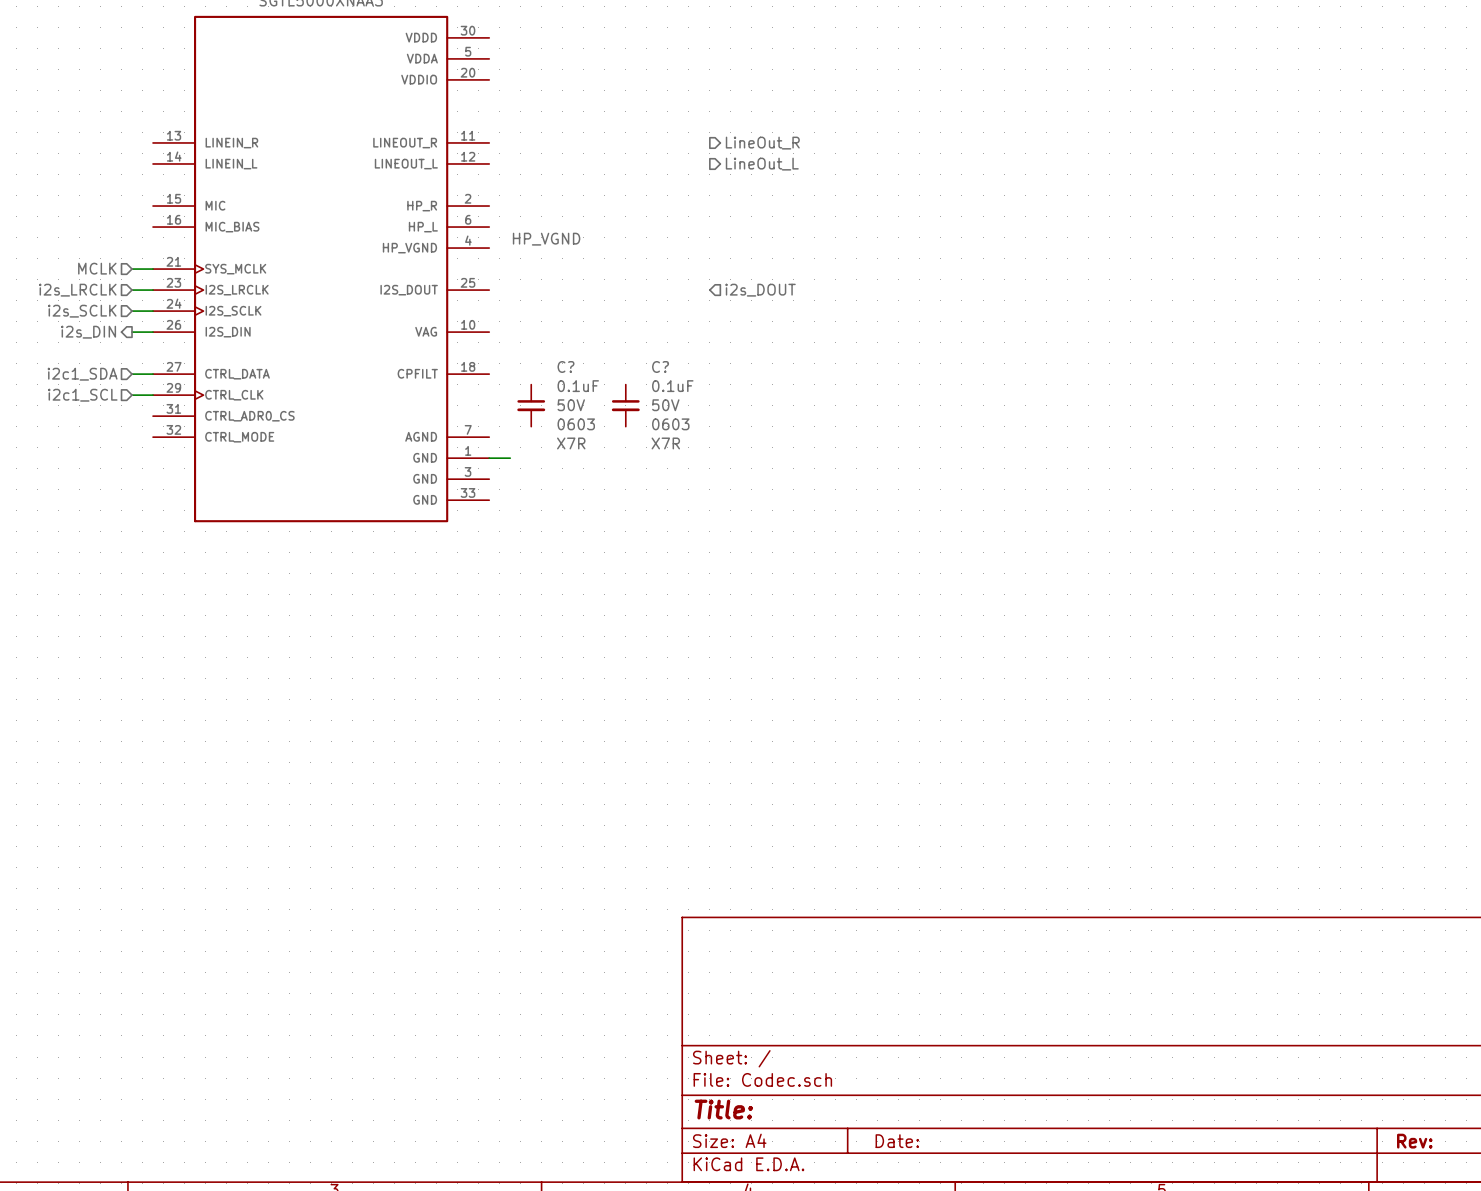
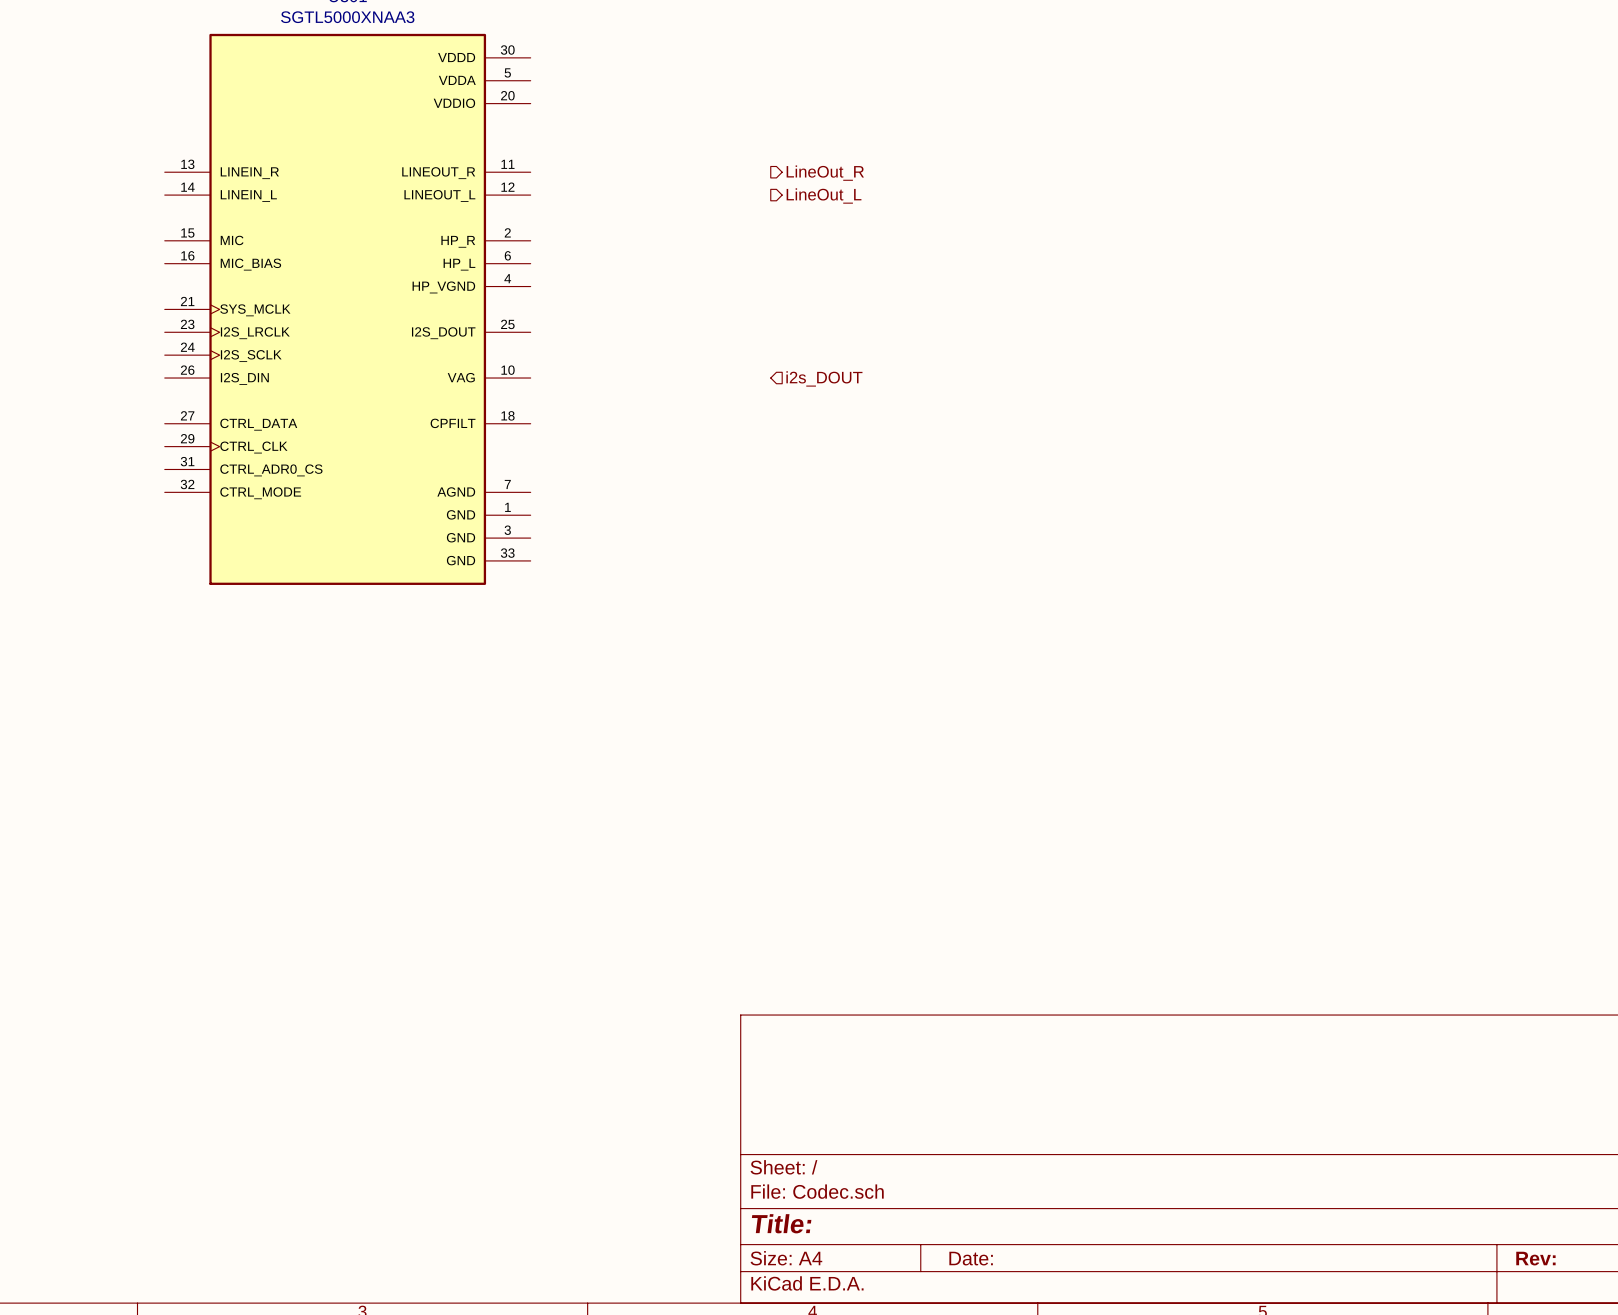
label: HP_VGND (546, 239) -> none
hierarchical label: MCLK (97, 268) -> none
wire: (132, 269) (153, 269) -> none
hierarchical label: i2s_LRCLK (77, 290) -> none
wire: (132, 290) (153, 290) -> none
hierarchical label position: i2s_DOUT (760, 290) -> i2s_DOUT (824, 378)
hierarchical label: i2s_SCLK (82, 311) -> none
wire: (132, 311) (153, 311) -> none
hierarchical label: i2s_DIN (88, 332) -> none
wire: (132, 332) (153, 332) -> none
hierarchical label: i2c1_SDA (82, 374) -> none
wire: (132, 374) (153, 374) -> none
hierarchical label: i2c1_SCL (82, 395) -> none
wire: (132, 395) (153, 395) -> none
C?: 0.1uF (531, 405) -> none
C?: 0.1uF (625, 405) -> none
wire: (489, 458) (510, 458) -> none

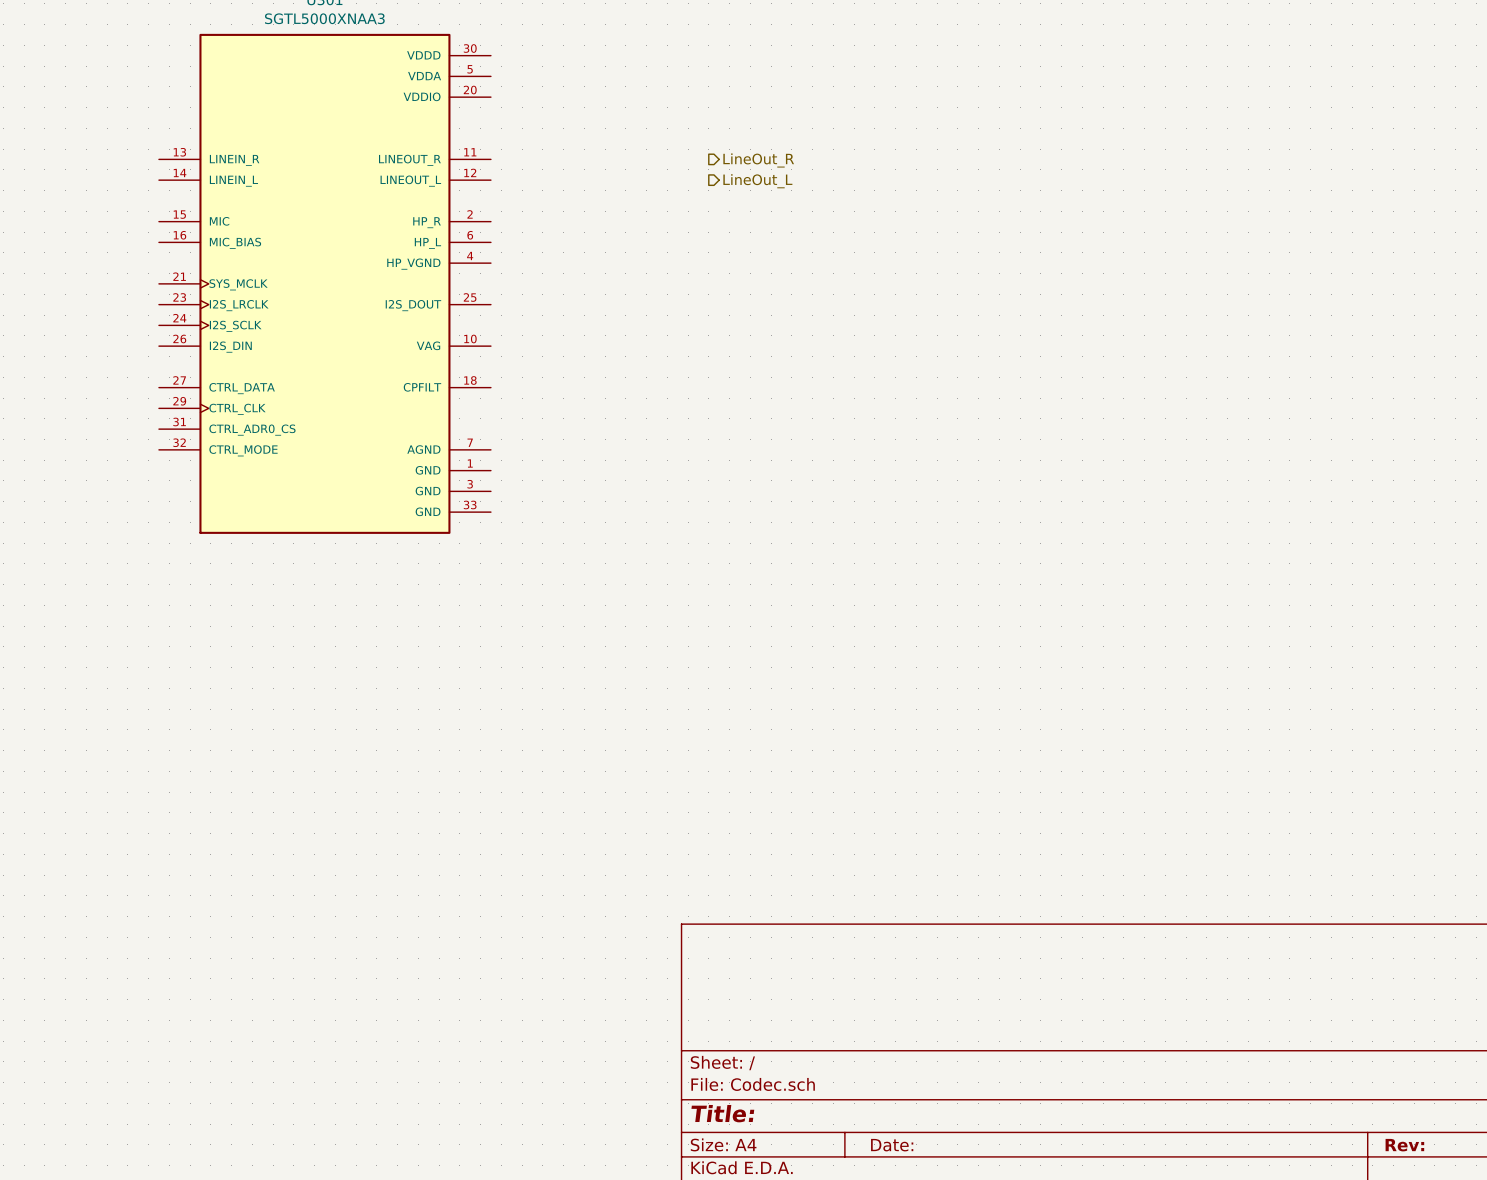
hierarchical label: i2s_DOUT (824, 378) -> none

